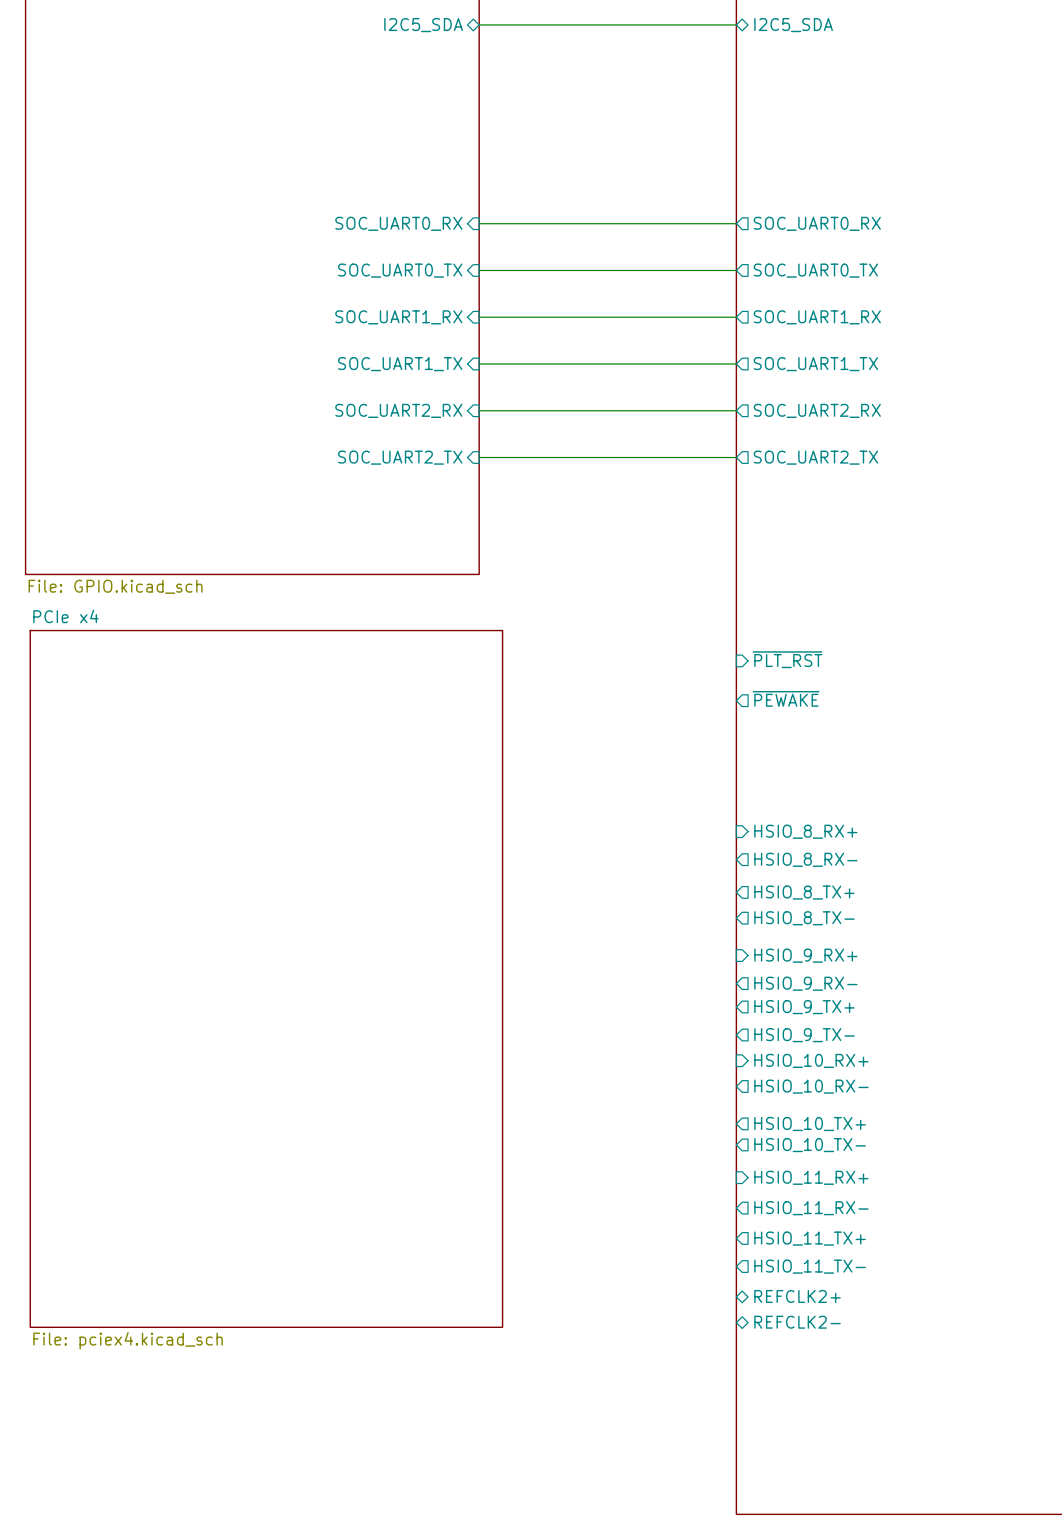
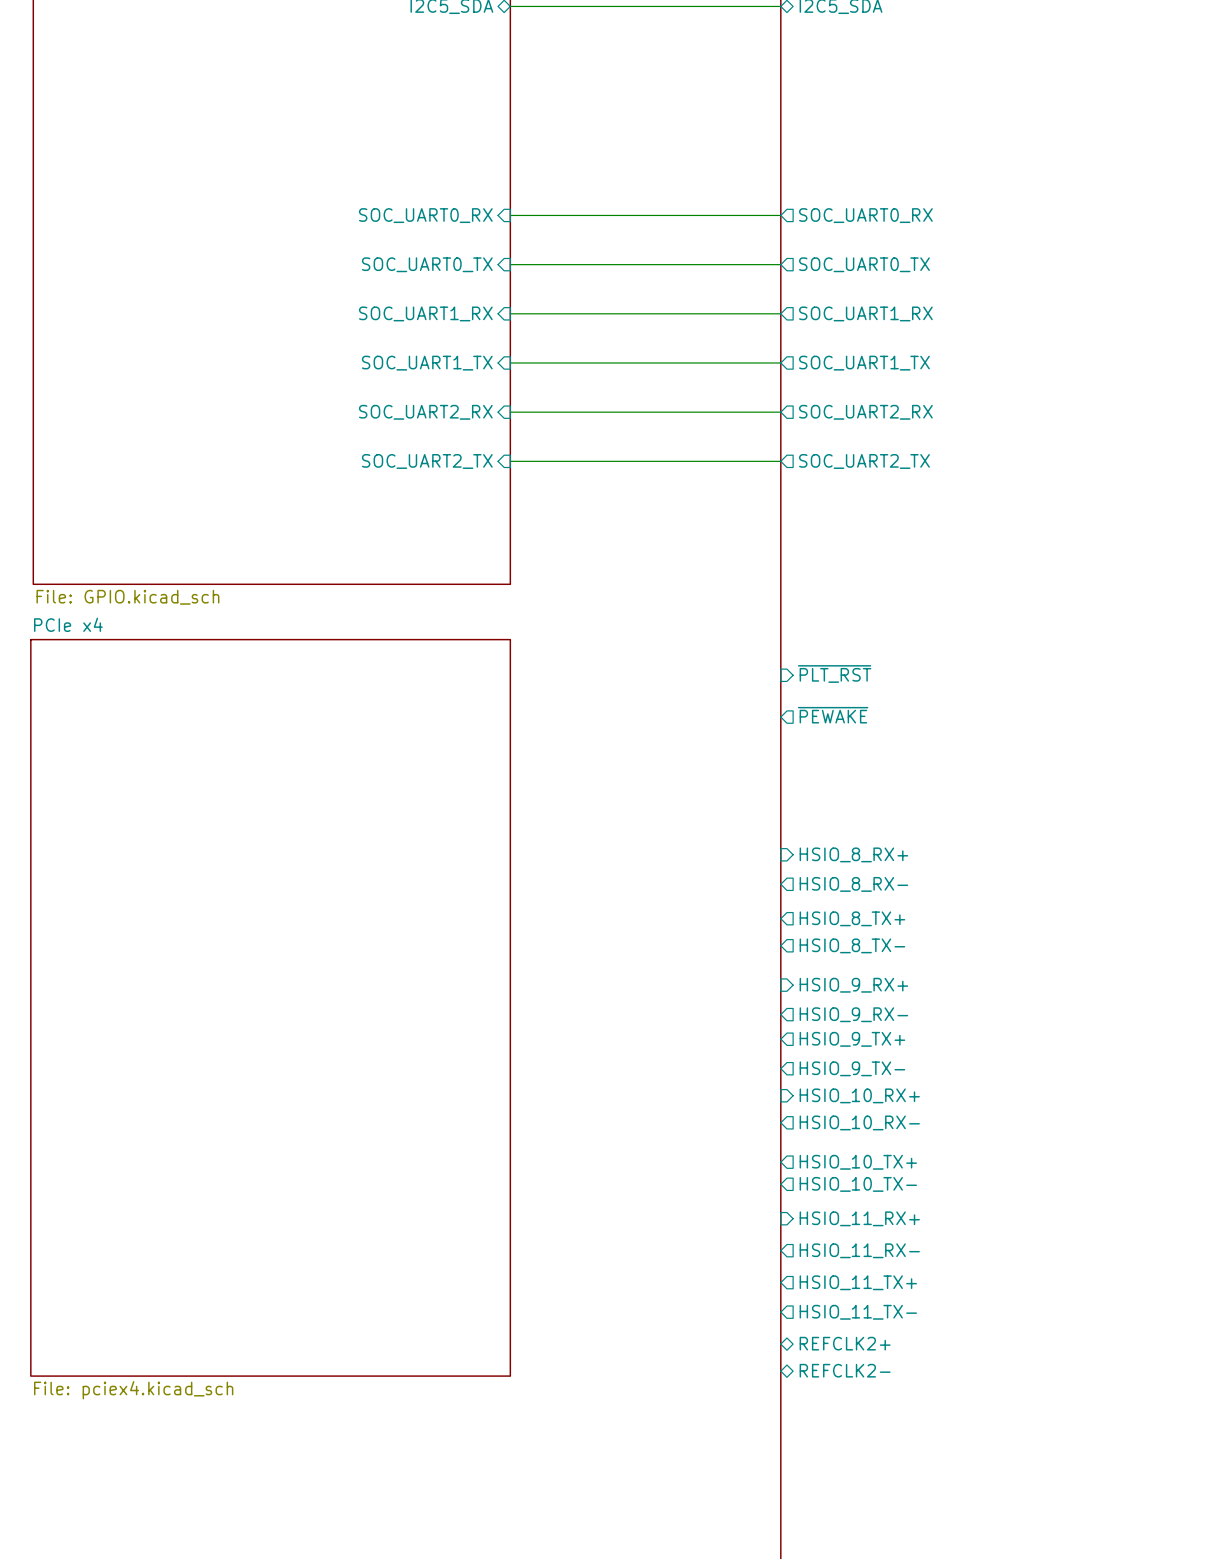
sheet PCIe x4 shape: [29, 629, 504, 1329] -> [30, 638, 512, 1377]

